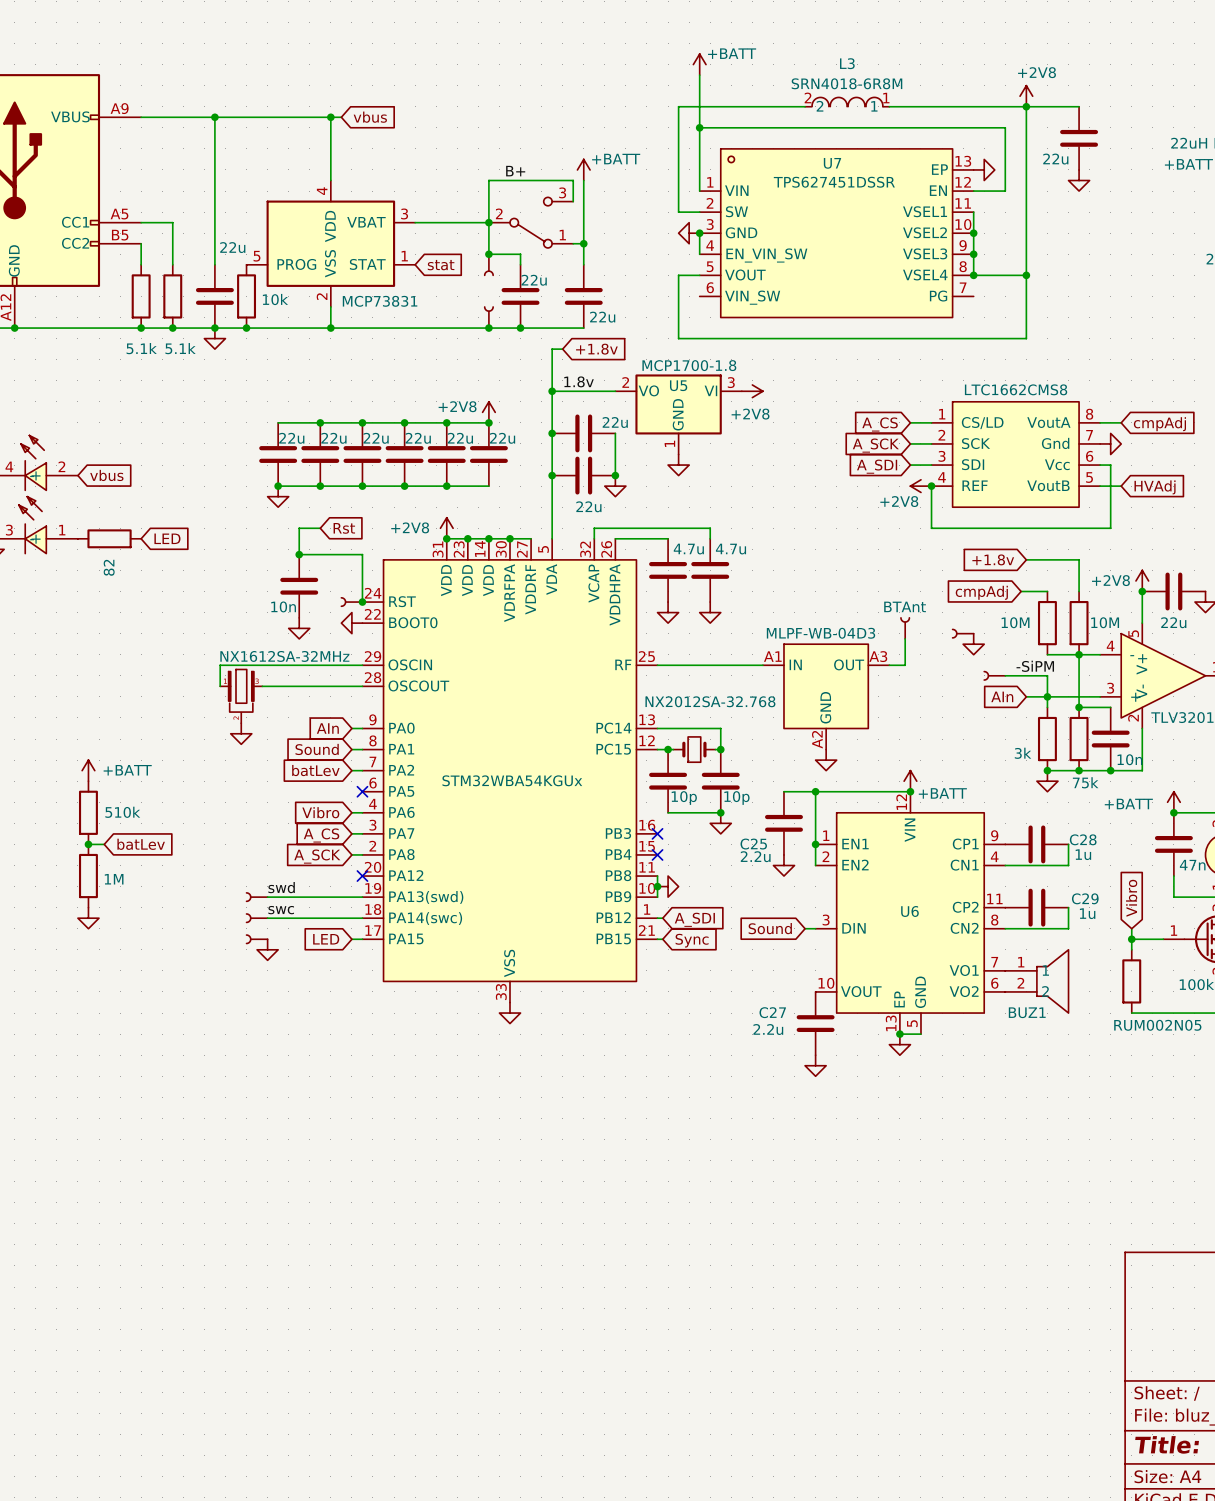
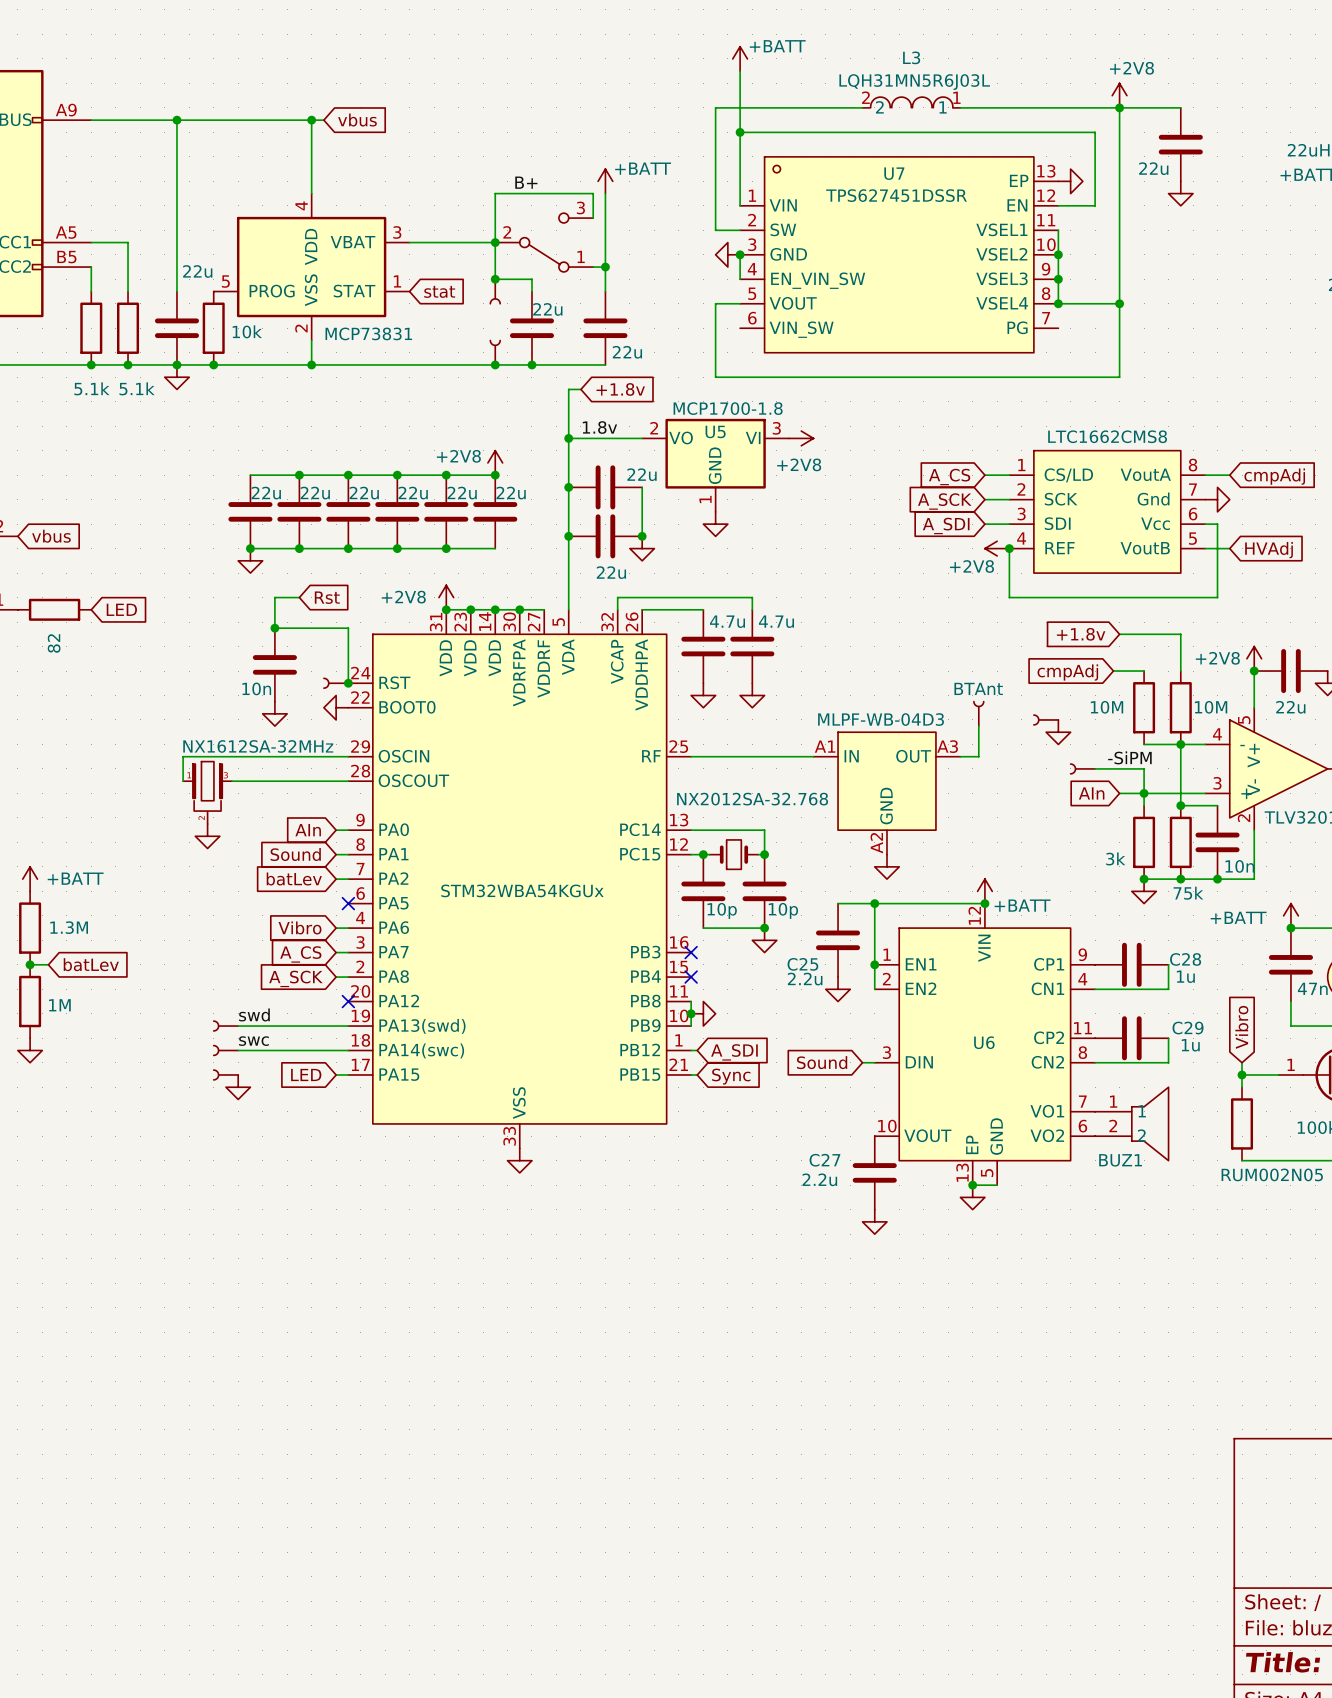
L3 value: SRN4018-6R8M (846, 83) -> LQH31MN5R6J03L (914, 82)
part value: 510k (122, 812) -> 1.3M (69, 927)

